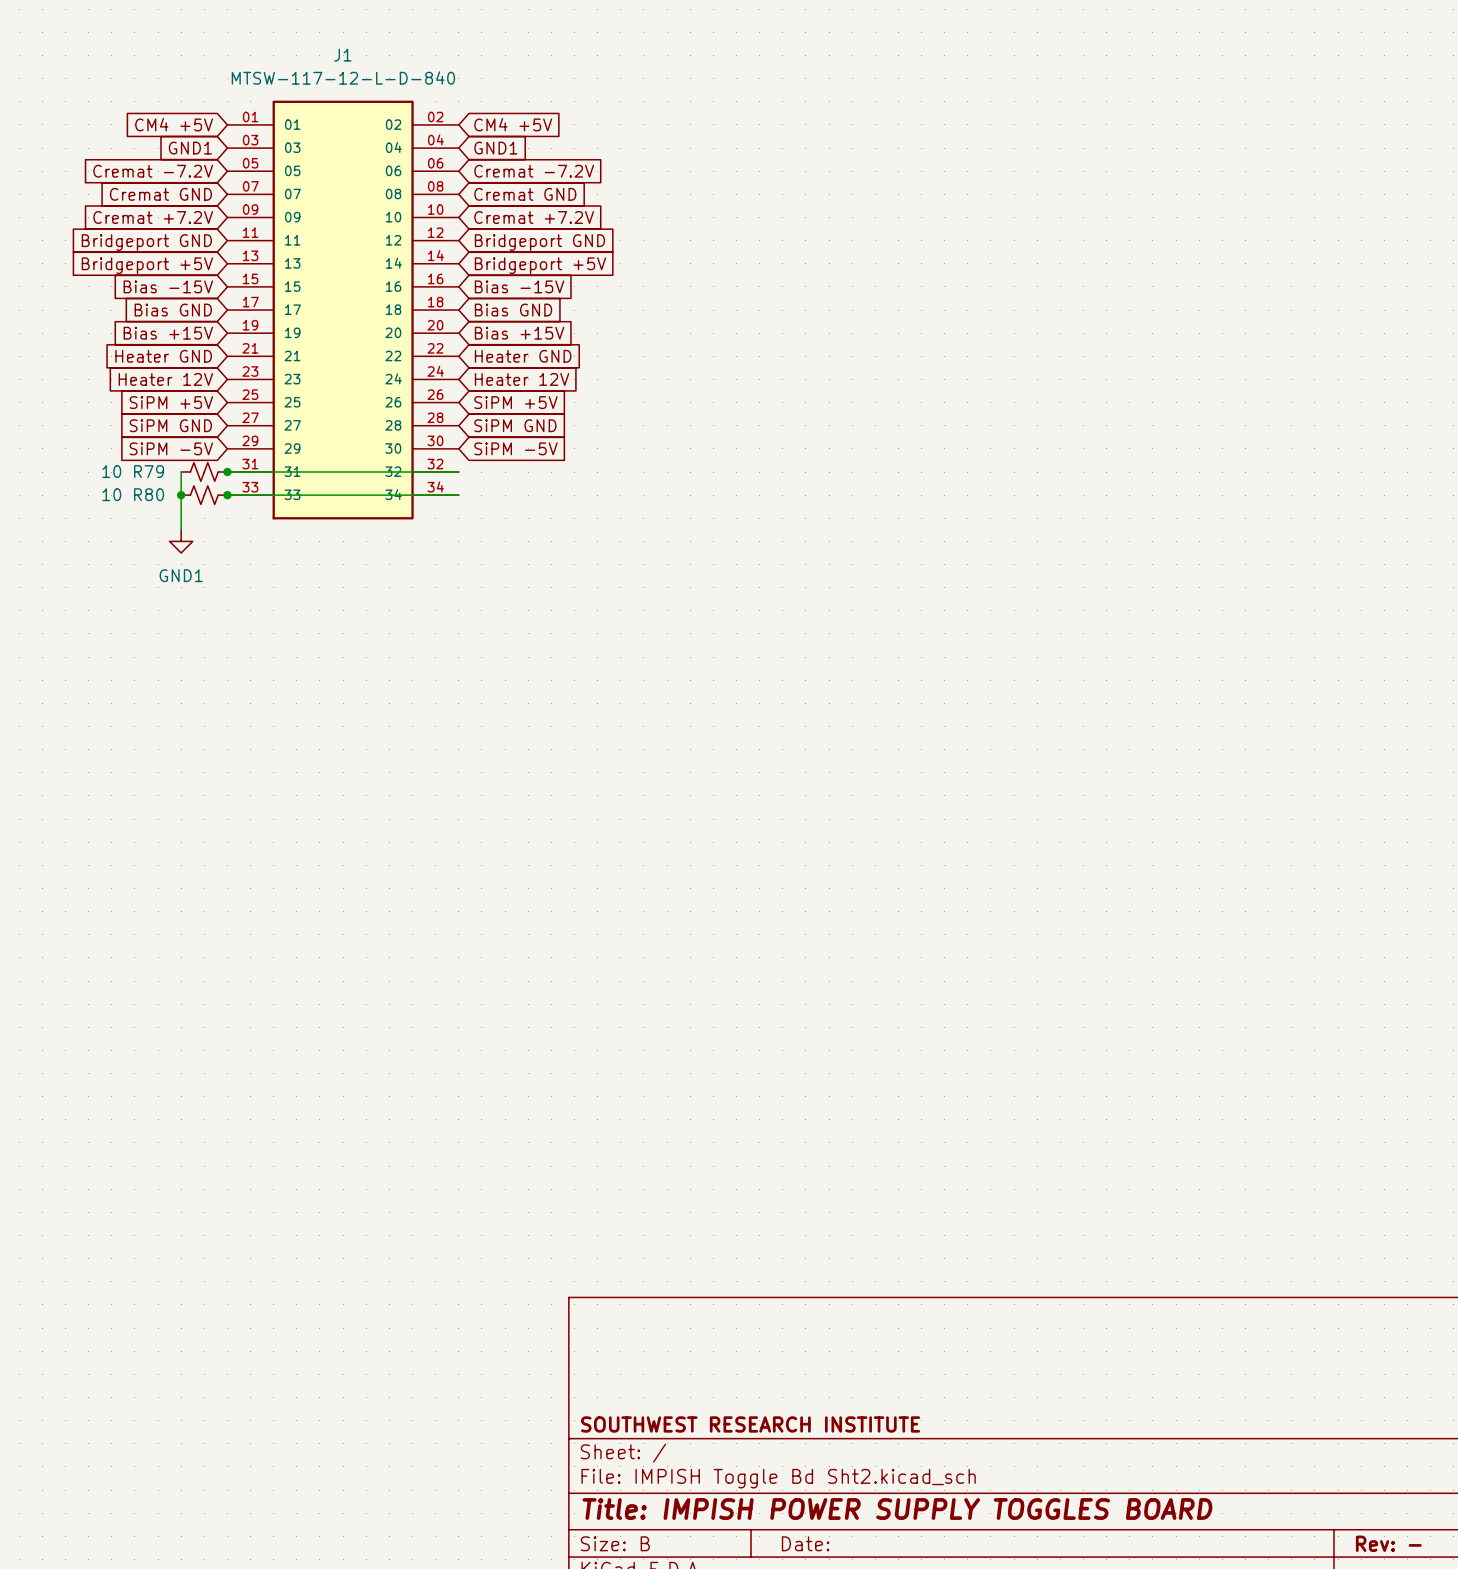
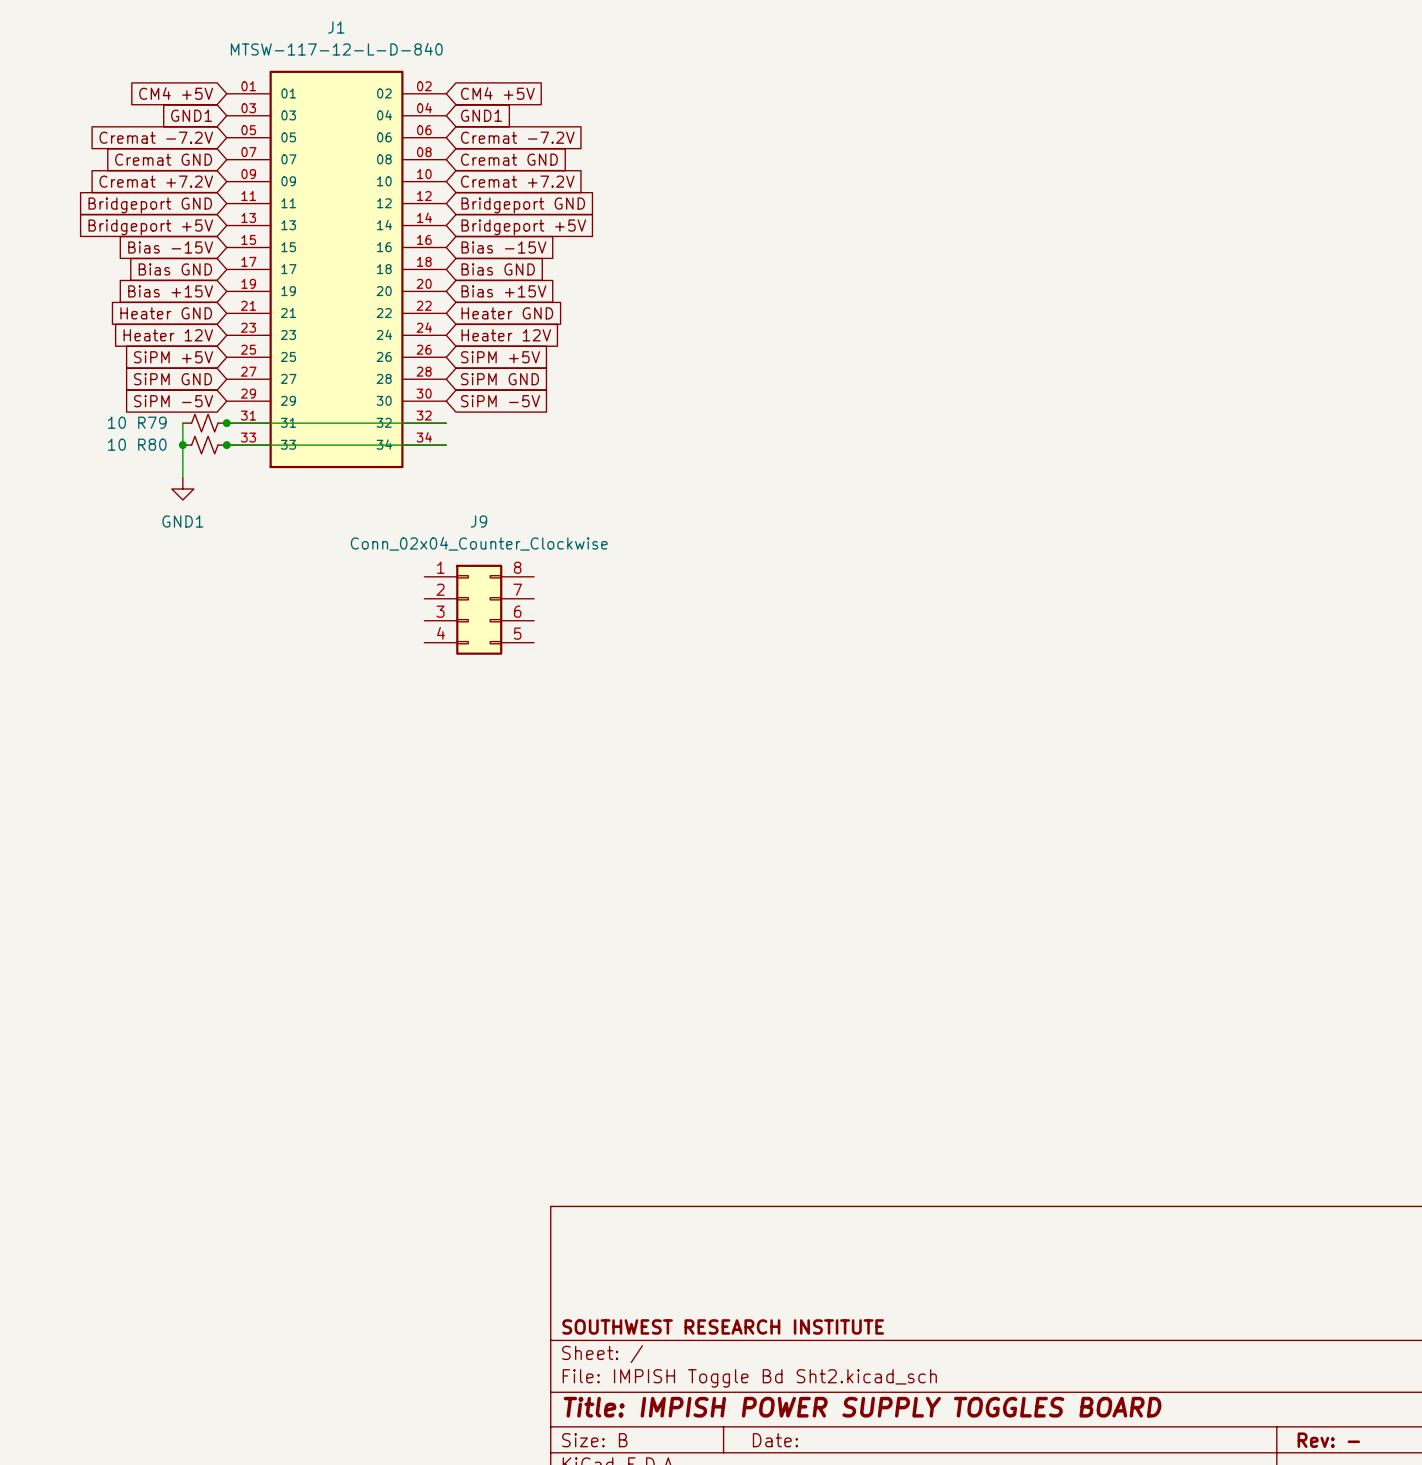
J9: none -> Conn_02x04_Counter_Clockwise (479, 609)

